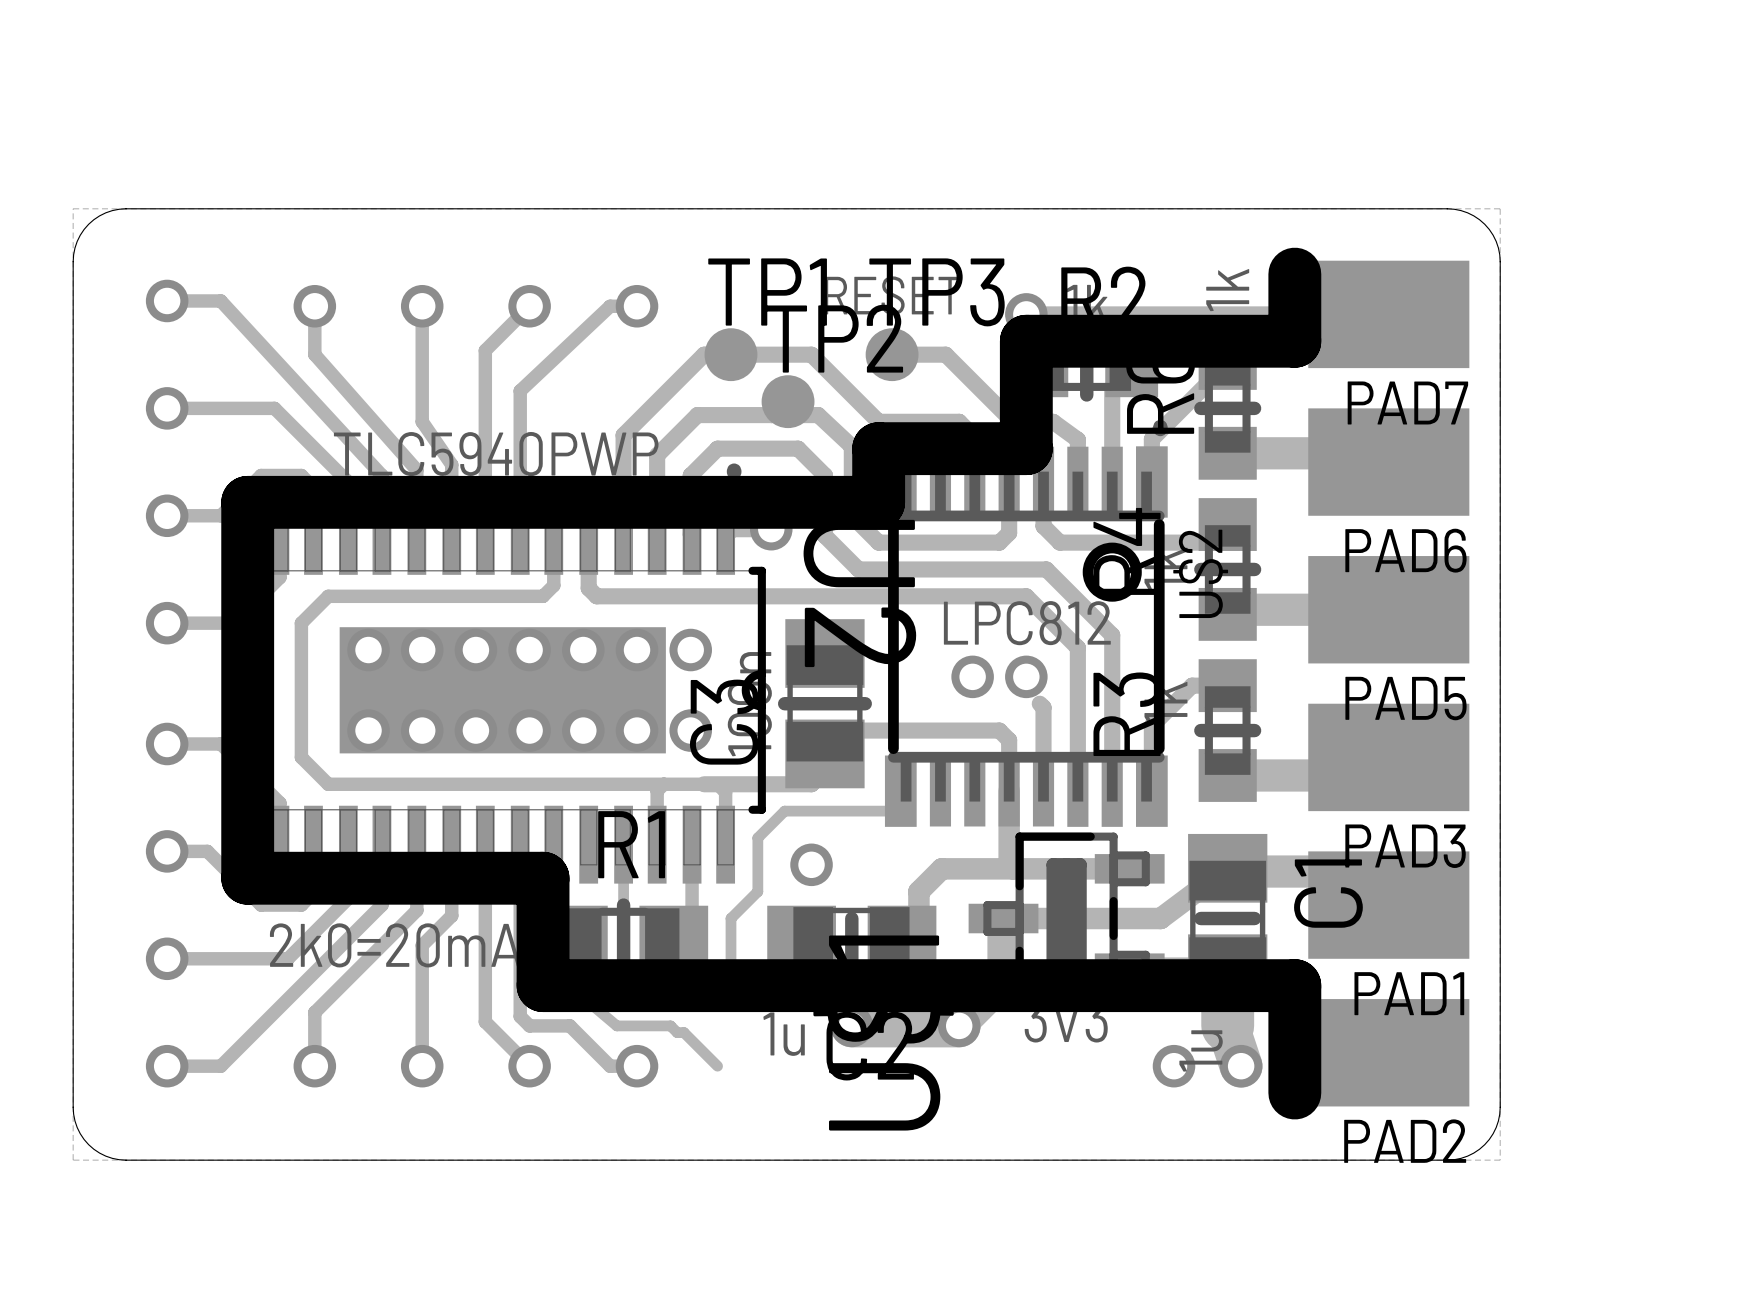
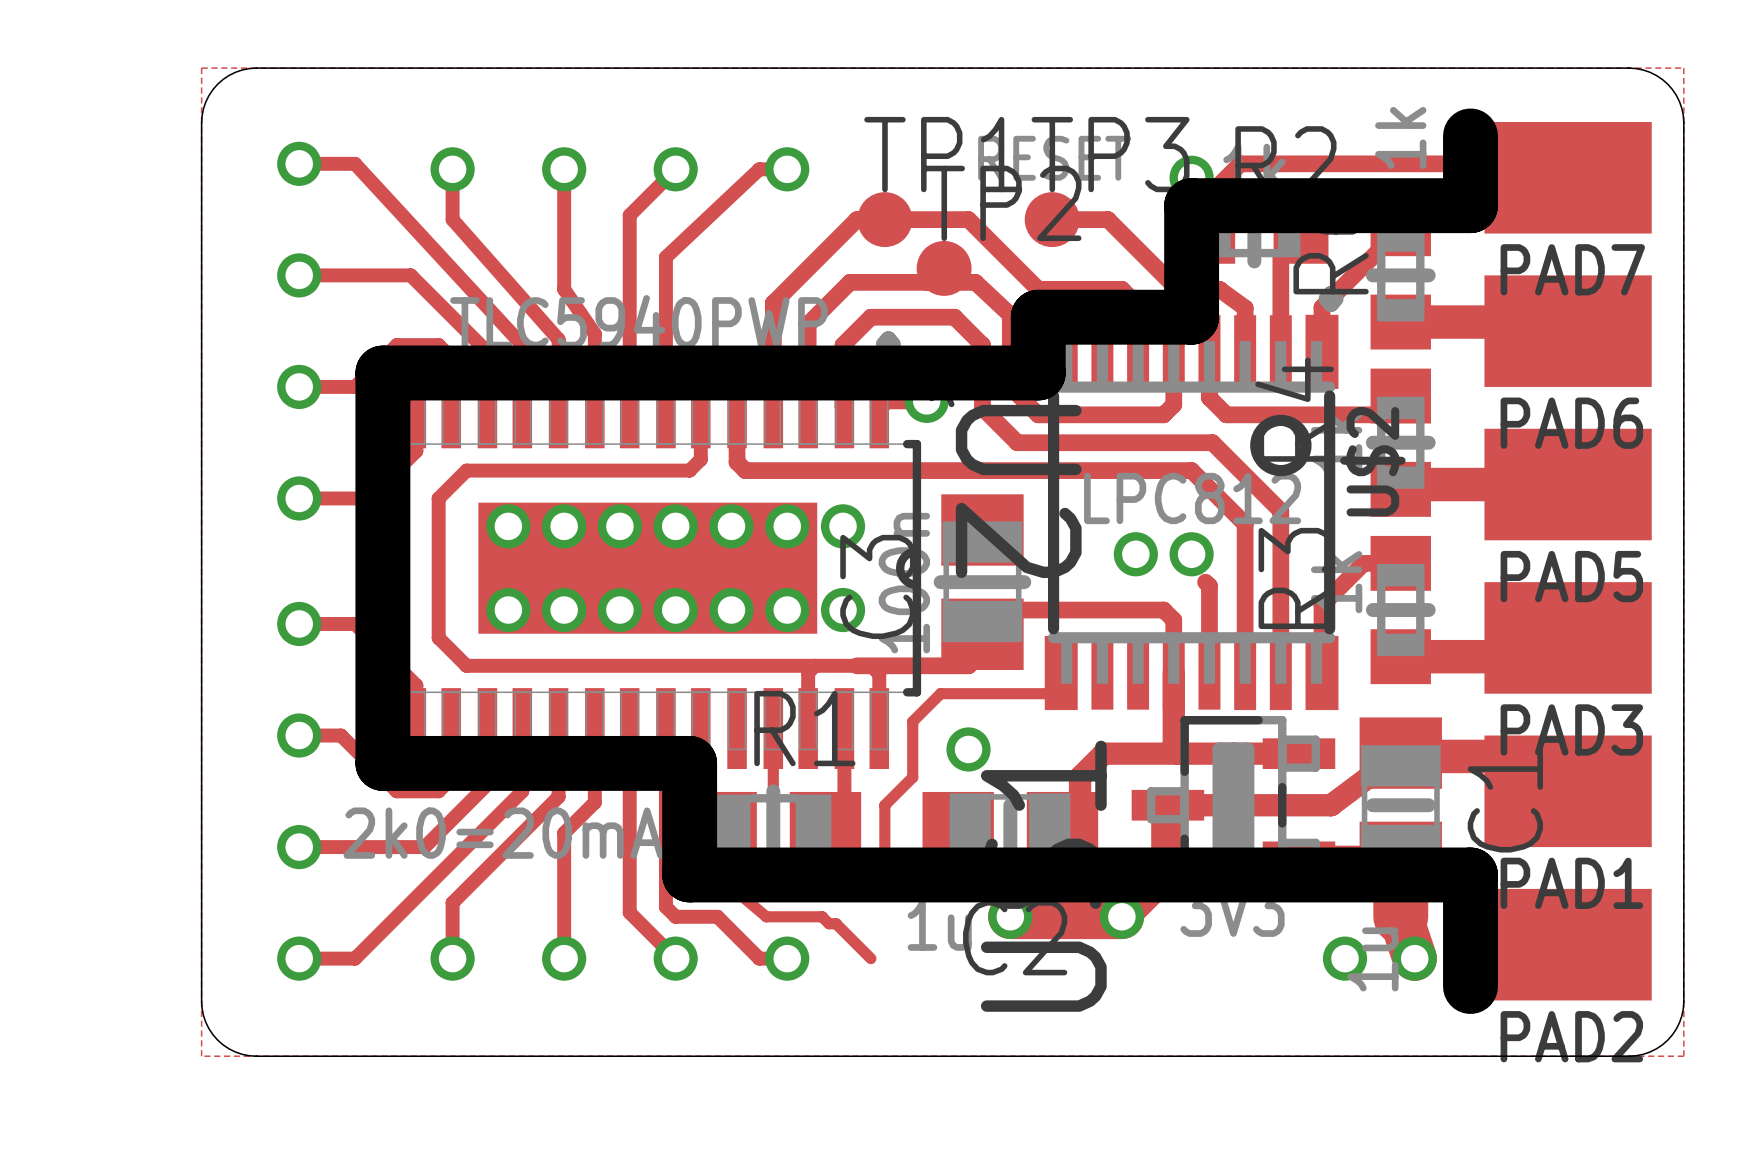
track: (1026, 314) (1388, 314) -> (1207, 196) (1240, 163) (1540, 163) (1568, 177)

